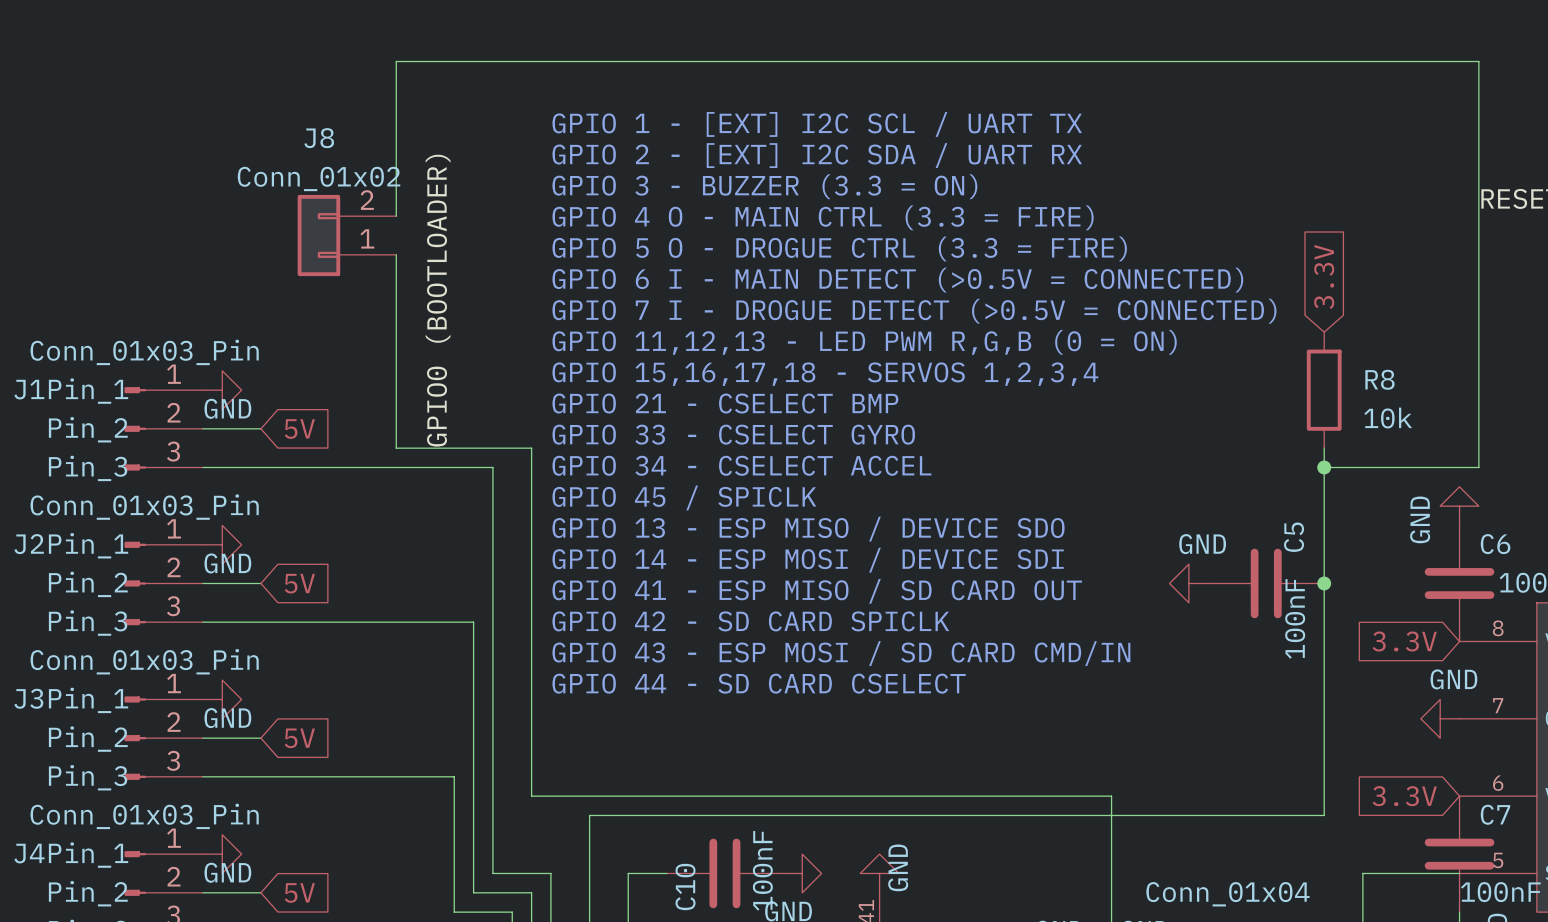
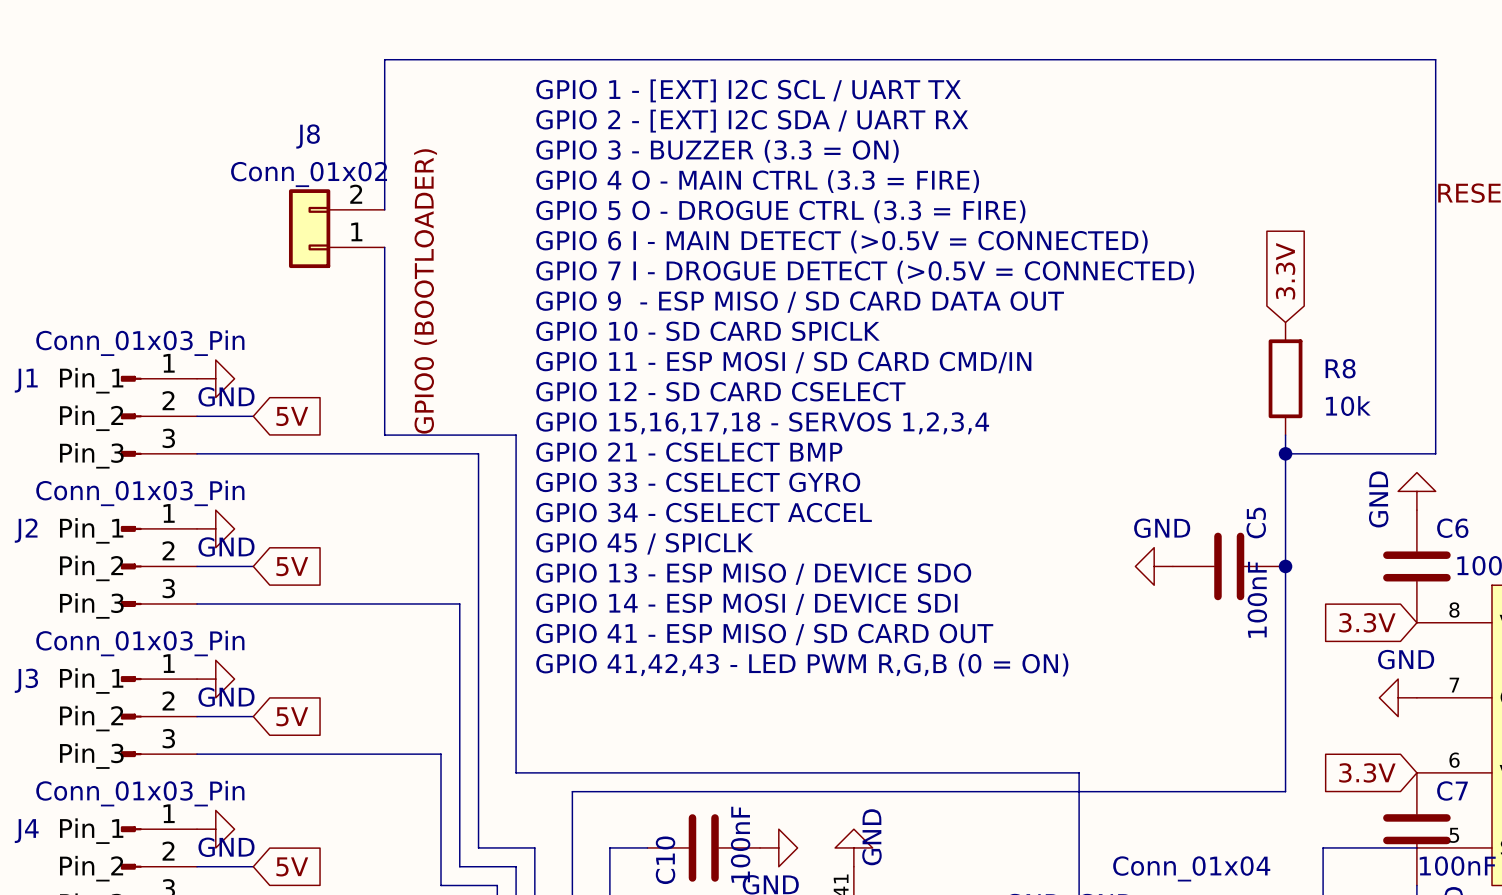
text: none -> GPIO 1 - [EXT] I2C SCL / UART TX (748, 90)
text: GPIO 1 - [EXT] I2C SCL / UART TX (817, 124) -> GPIO 2 - [EXT] I2C SDA / UART RX (752, 121)
text: GPIO 2 - [EXT] I2C SDA / UART RX (817, 155) -> GPIO 3 - BUZZER (3.3 = ON) (717, 151)
text: GPIO 3 - BUZZER (3.3 = ON) (764, 186) -> GPIO 4 O - MAIN CTRL (3.3 = FIRE) (757, 181)
text: GPIO 4 O - MAIN CTRL (3.3 = FIRE) (823, 217) -> GPIO 5 O - DROGUE CTRL (3.3 = FIRE) (780, 211)
text: GPIO 5 O - DROGUE CTRL (3.3 = FIRE) (839, 248) -> GPIO 6 I - MAIN DETECT (>0.5V = CONNECTED) (841, 241)
text: GPIO 6 I - MAIN DETECT (>0.5V = CONNECTED) (897, 280) -> GPIO 7 I - DROGUE DETECT (>0.5V = CONNECTED) (865, 272)
text: GPIO 7 I - DROGUE DETECT (>0.5V = CONNECTED) (914, 311) -> GPIO 9 - ESP MISO / SD CARD DATA OUT (800, 302)
text: GPIO 11,12,13 - LED PWM R,G,B (0 = ON) (864, 342) -> GPIO 10 - SD CARD SPICLK (708, 331)
text: GPIO 15,16,17,18 - SERVOS 1,2,3,4 (825, 374) -> GPIO 11 - ESP MOSI / SD CARD CMD/IN (783, 362)
text: GPIO 21 - CSELECT BMP (725, 403) -> GPIO 12 - SD CARD CSELECT (720, 391)
text: GPIO 33 - CSELECT GYRO (733, 434) -> GPIO 15,16,17,18 - SERVOS 1,2,3,4 (762, 423)
text: GPIO 34 - CSELECT ACCEL (741, 465) -> GPIO 21 - CSELECT BMP (689, 452)
text: GPIO 45 / SPICLK (684, 497) -> GPIO 33 - CSELECT GYRO (698, 482)
text: GPIO 13 - ESP MISO / DEVICE SDO (808, 529) -> GPIO 34 - CSELECT ACCEL (704, 512)
text: GPIO 14 - ESP MOSI / DEVICE SDI (808, 560) -> GPIO 45 / SPICLK (644, 543)
text: GPIO 41 - ESP MISO / SD CARD OUT (817, 591) -> GPIO 13 - ESP MISO / DEVICE SDO (753, 574)
text: GPIO 42 - SD CARD SPICLK (750, 621) -> GPIO 14 - ESP MOSI / DEVICE SDI (746, 604)
text: GPIO 43 - ESP MOSI / SD CARD CMD/IN (841, 653) -> GPIO 41 - ESP MISO / SD CARD OUT (764, 634)
text: GPIO 44 - SD CARD CSELECT (759, 683) -> GPIO 41,42,43 - LED PWM R,G,B (0 = ON) (802, 665)

